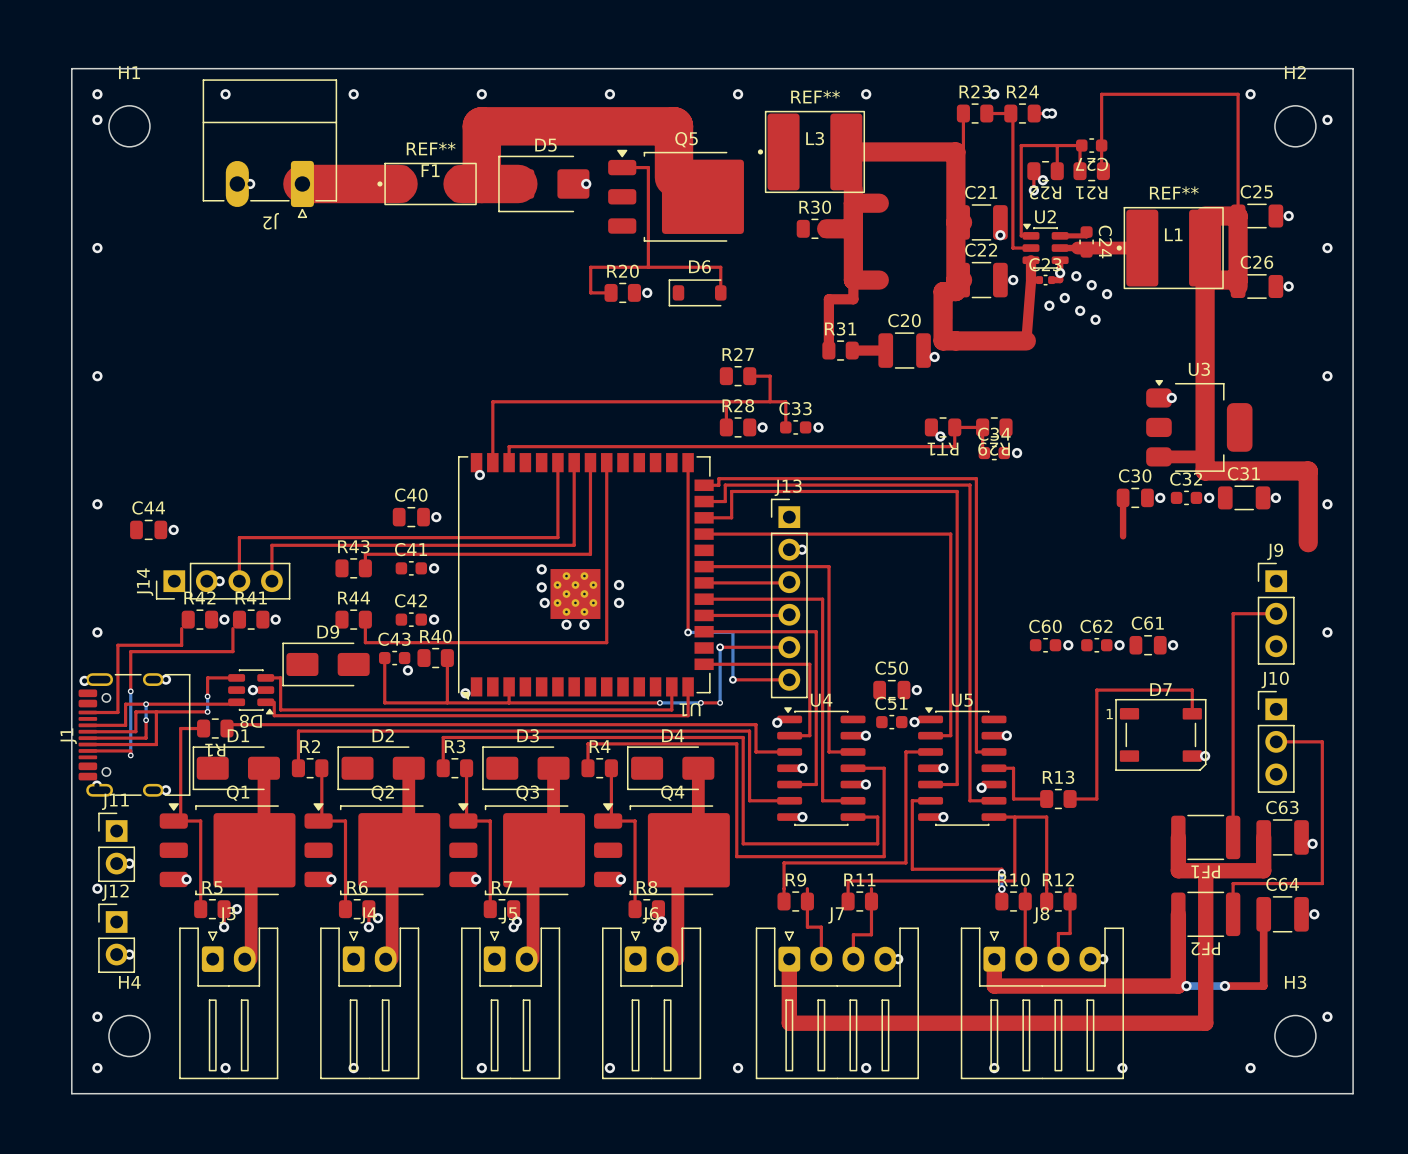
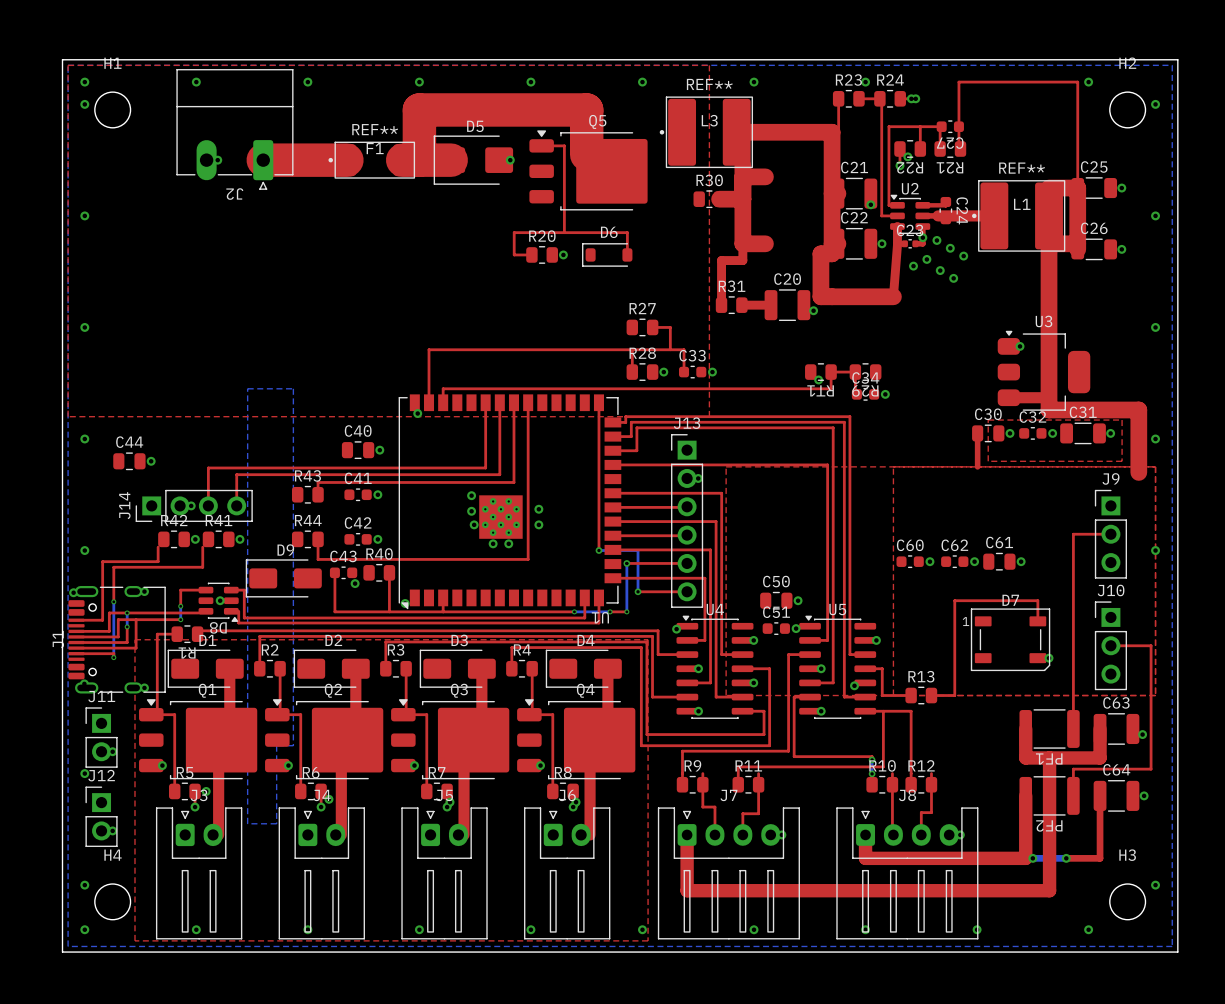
top zone outline: none -> (68, 65) (709, 65) (709, 416) (68, 416) (68, 65)
bottom zone outline: none -> (68, 65) (1172, 65) (1172, 946) (68, 946) (68, 65)
bottom zone outline: none -> (247, 388) (293, 388) (293, 745) (276, 745) (276, 823) (247, 823) (247, 388)
top zone outline: none -> (988, 420) (1122, 420) (1122, 461) (988, 461) (988, 420)
top zone outline: none -> (726, 466) (1155, 466) (1155, 695) (726, 695) (726, 466)
top zone outline: none -> (893, 466) (893, 695)
top zone outline: none -> (134, 639) (648, 639) (648, 940) (134, 940) (134, 639)

